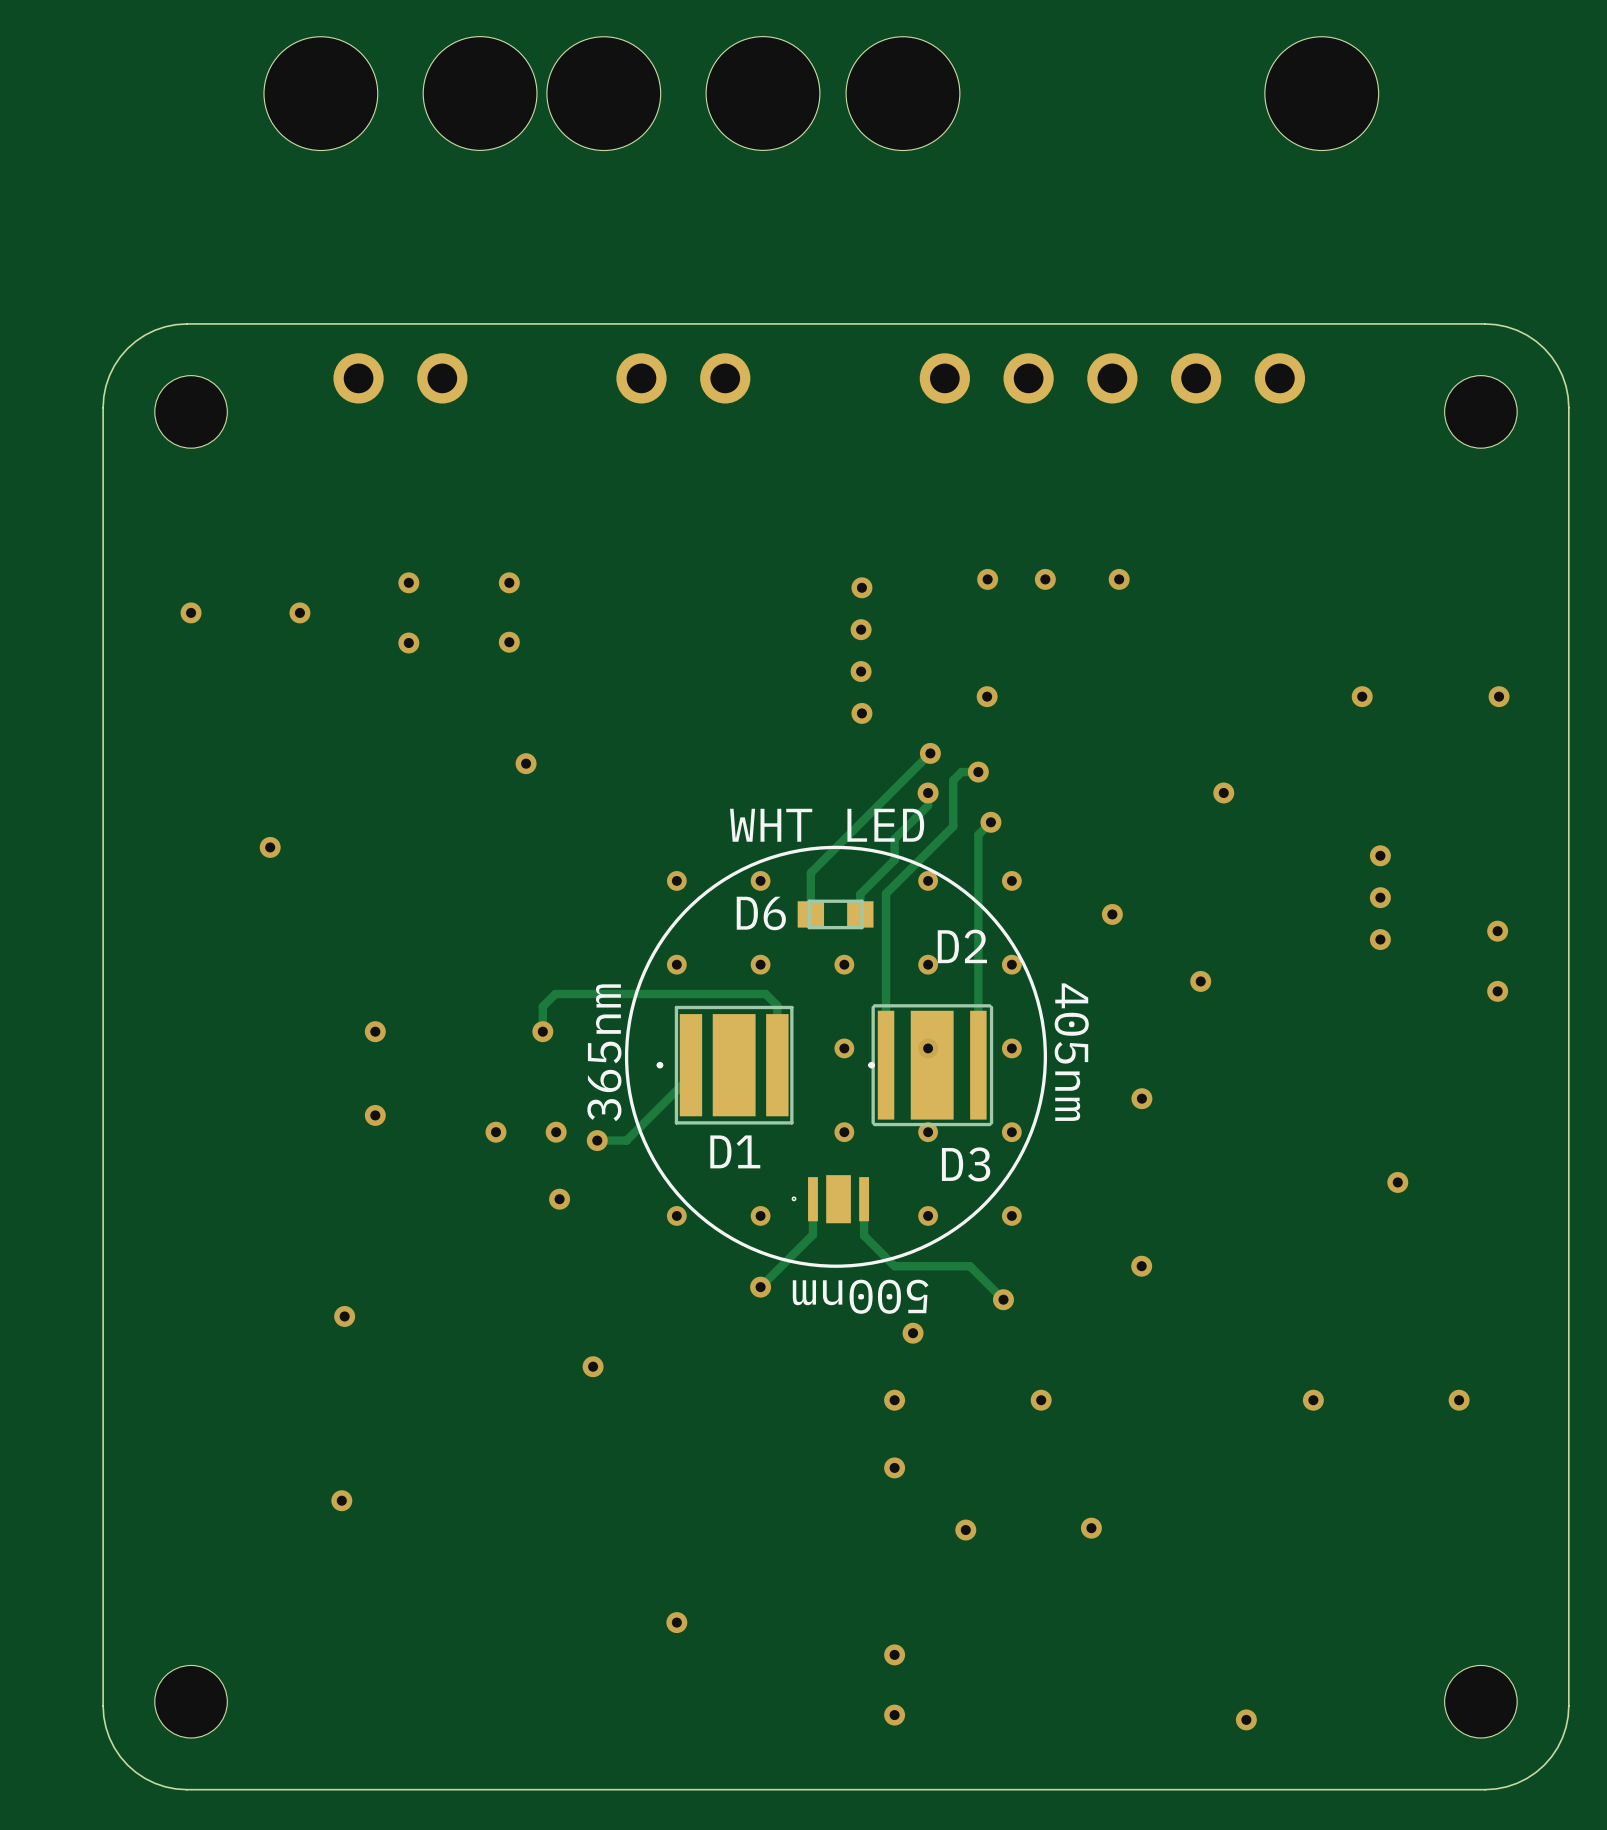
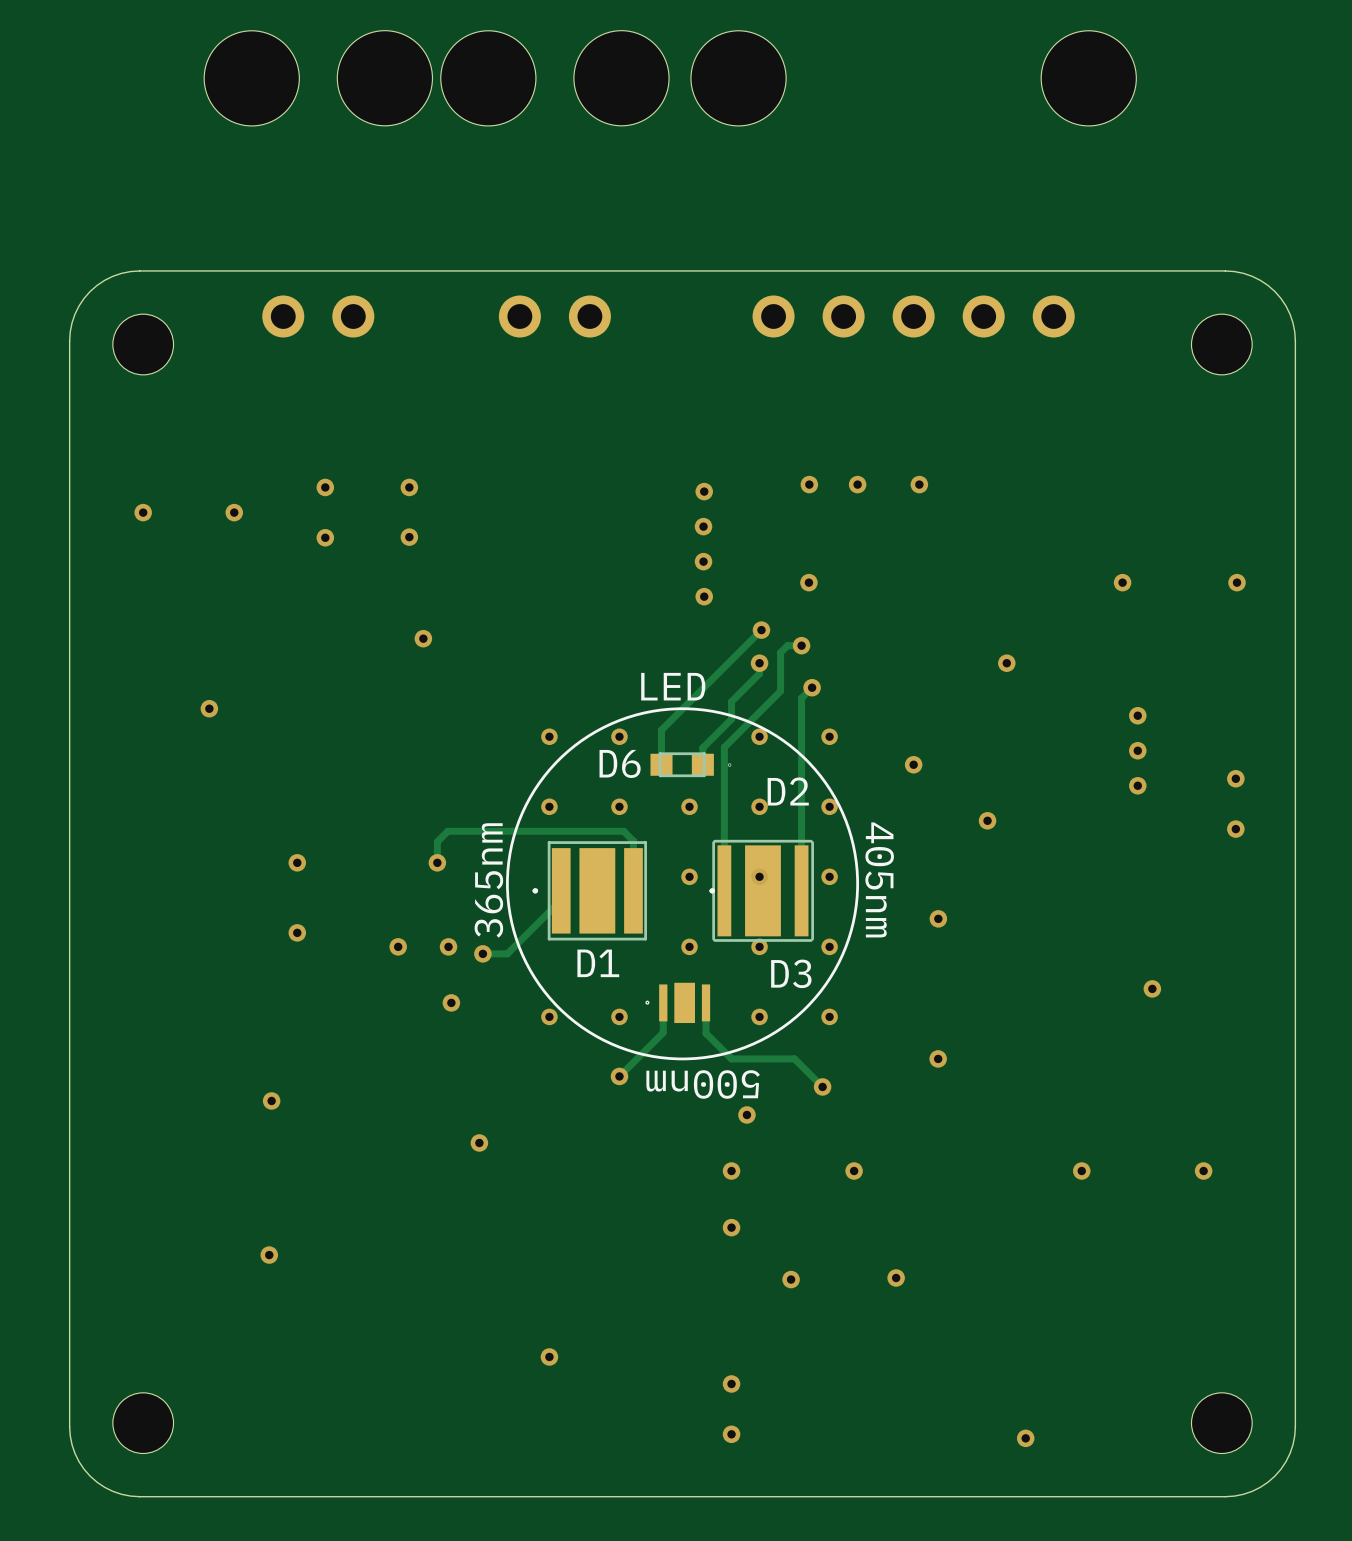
D6 value: WHT LED (827, 825) -> LED (673, 686)
D6 footprint: [797, 899, 874, 930] -> [650, 752, 732, 778]

